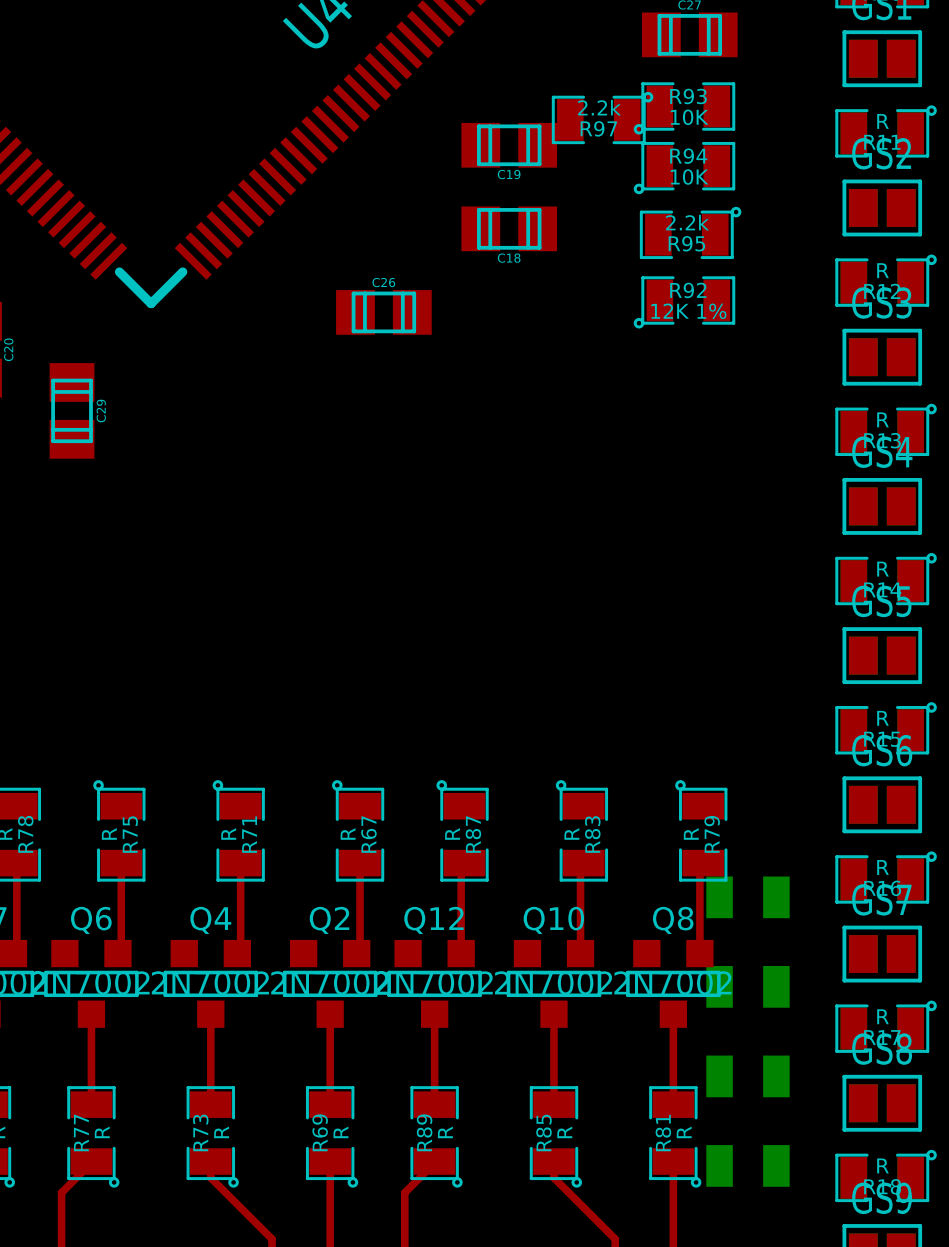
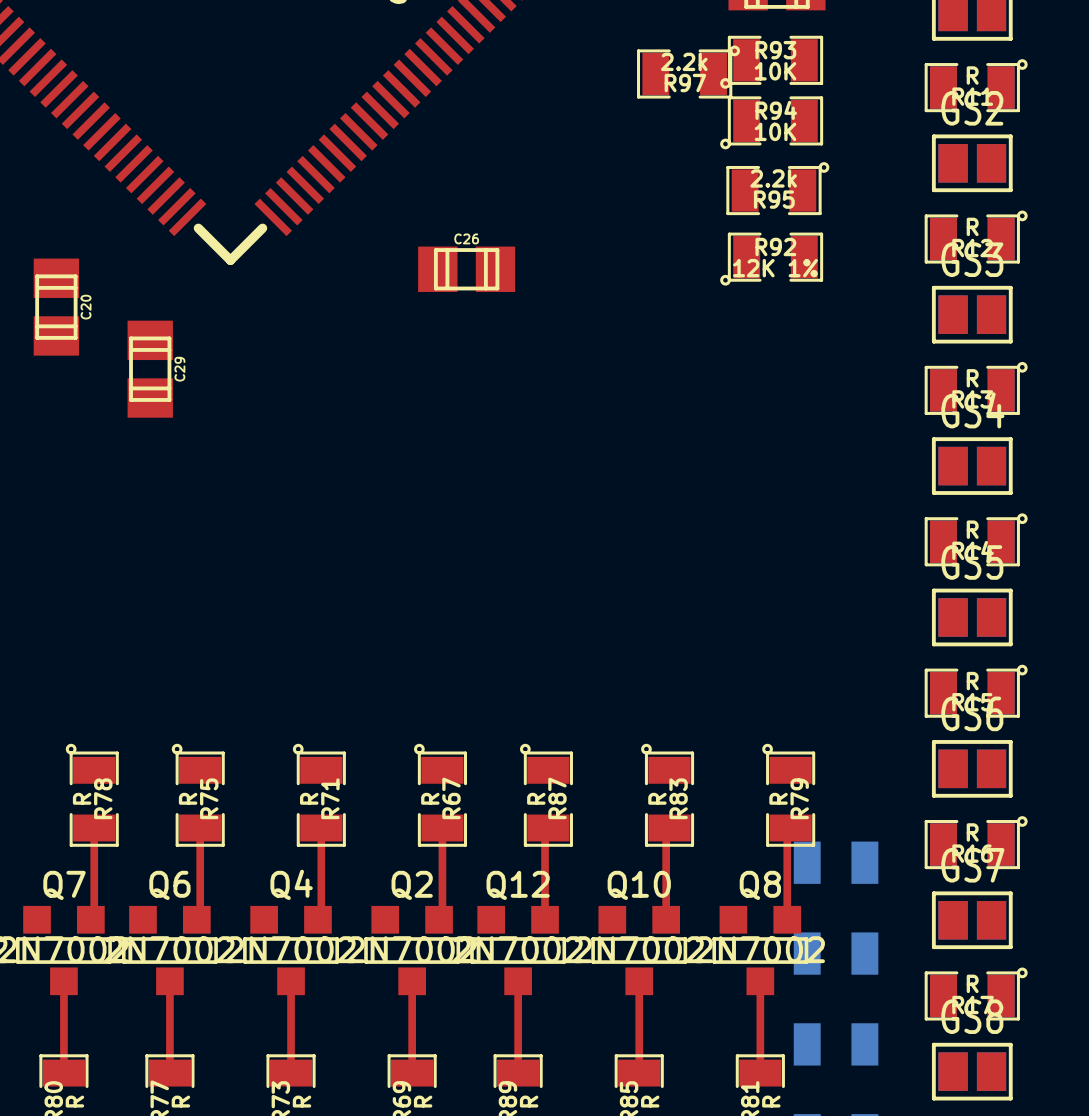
C19: (509, 145) -> none
C18: (509, 228) -> none

